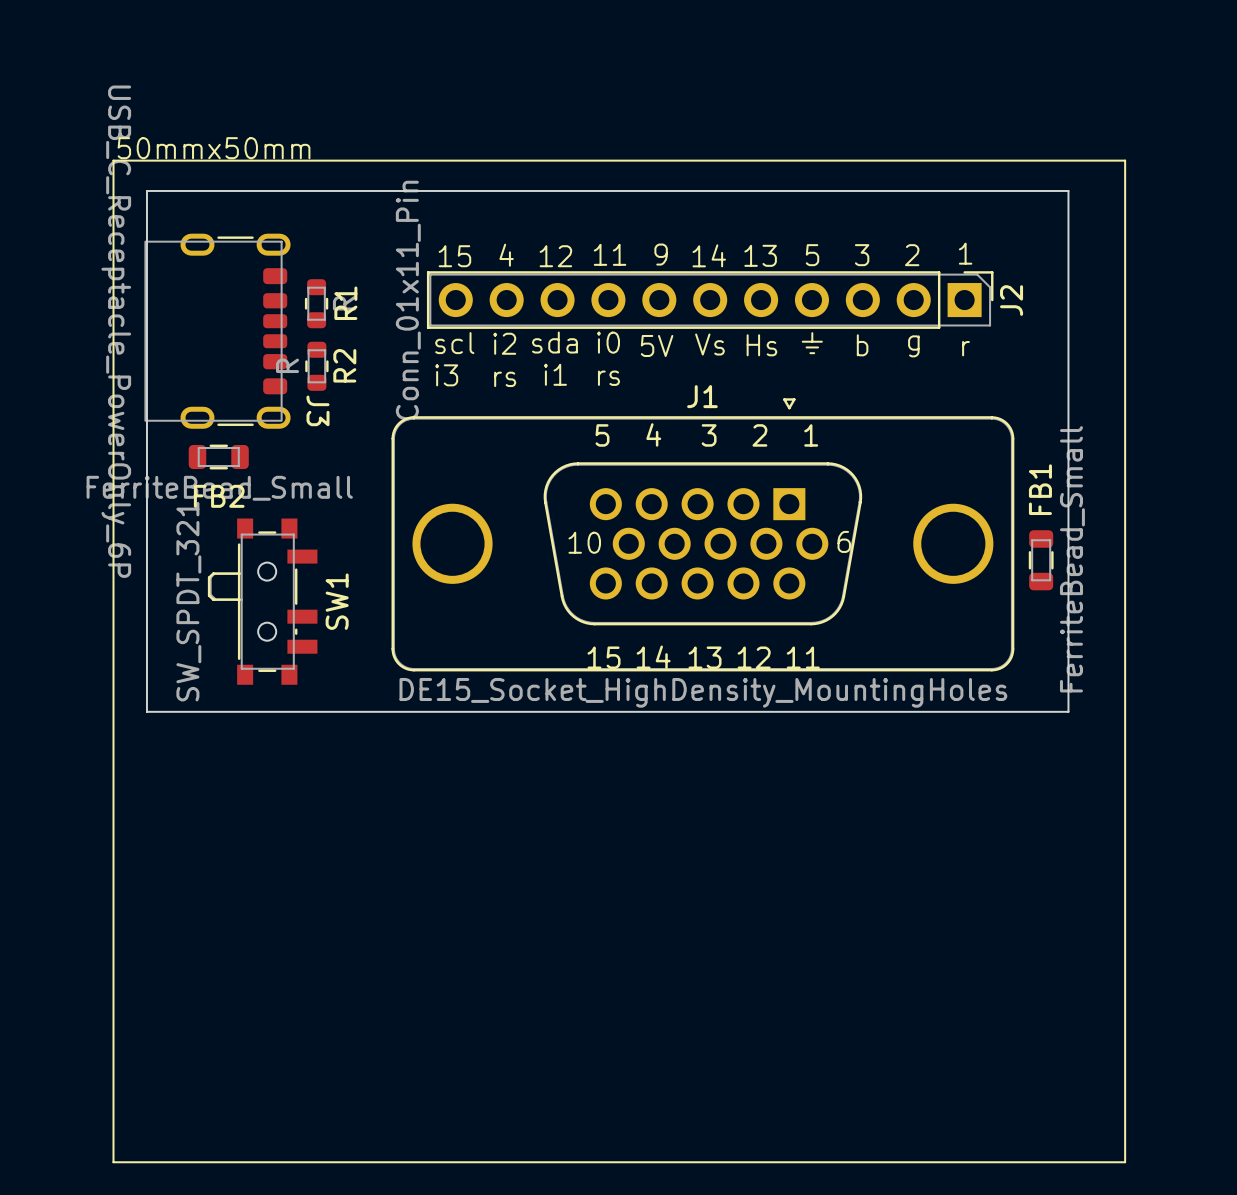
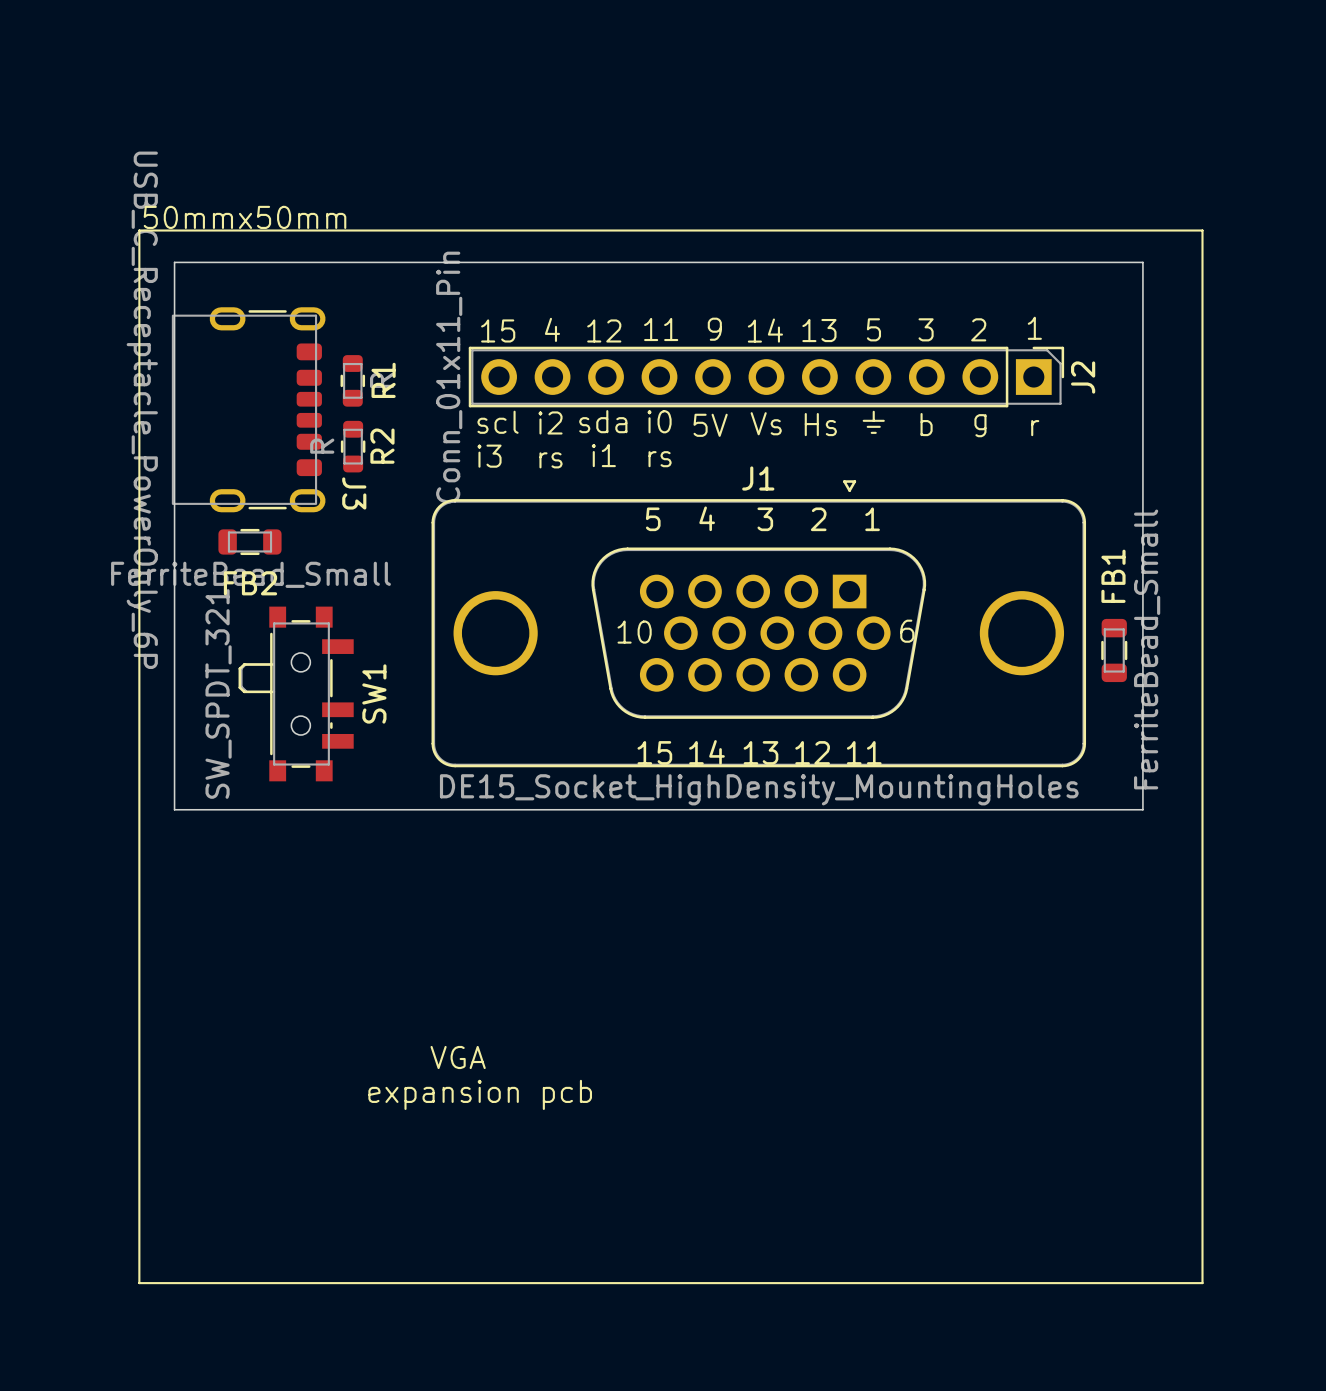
text: none -> VGA (458, 1057)
text: none -> expansion pcb (480, 1094)

